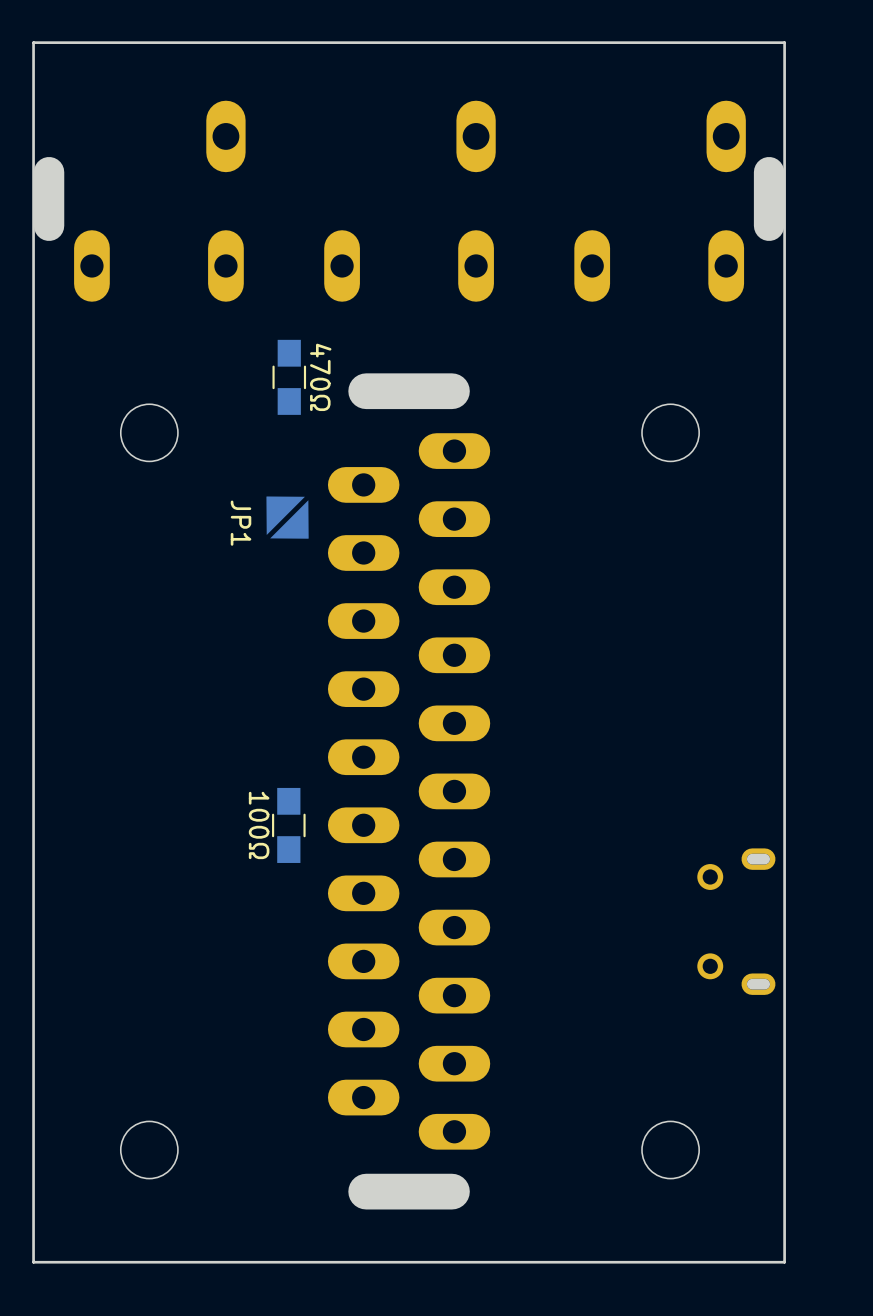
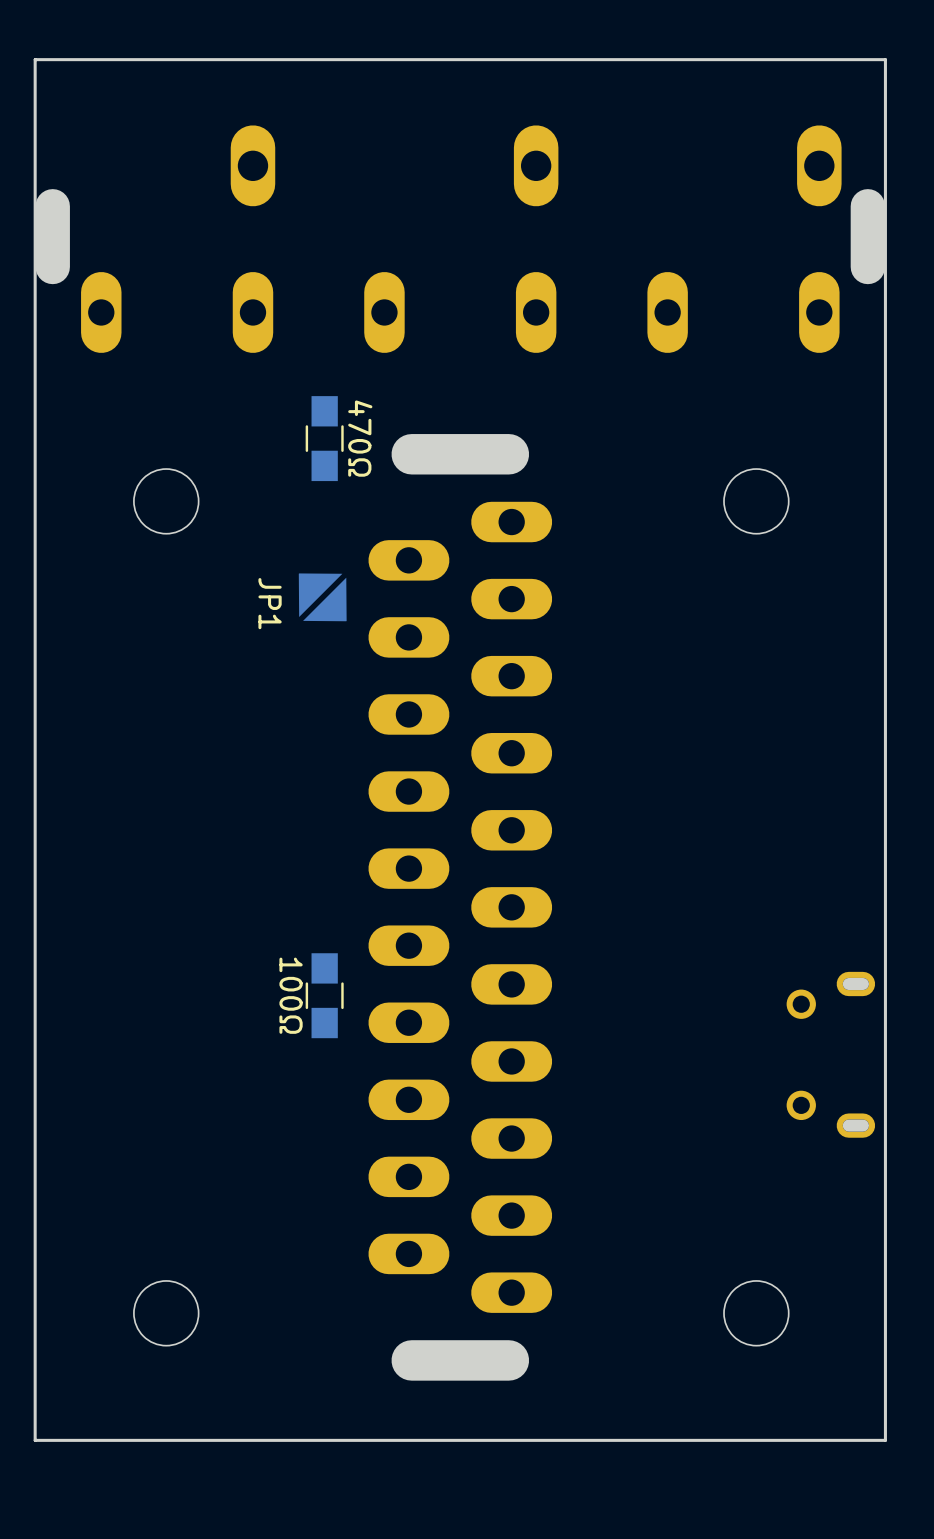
100Ω position: (288, 825) -> (324, 995)

